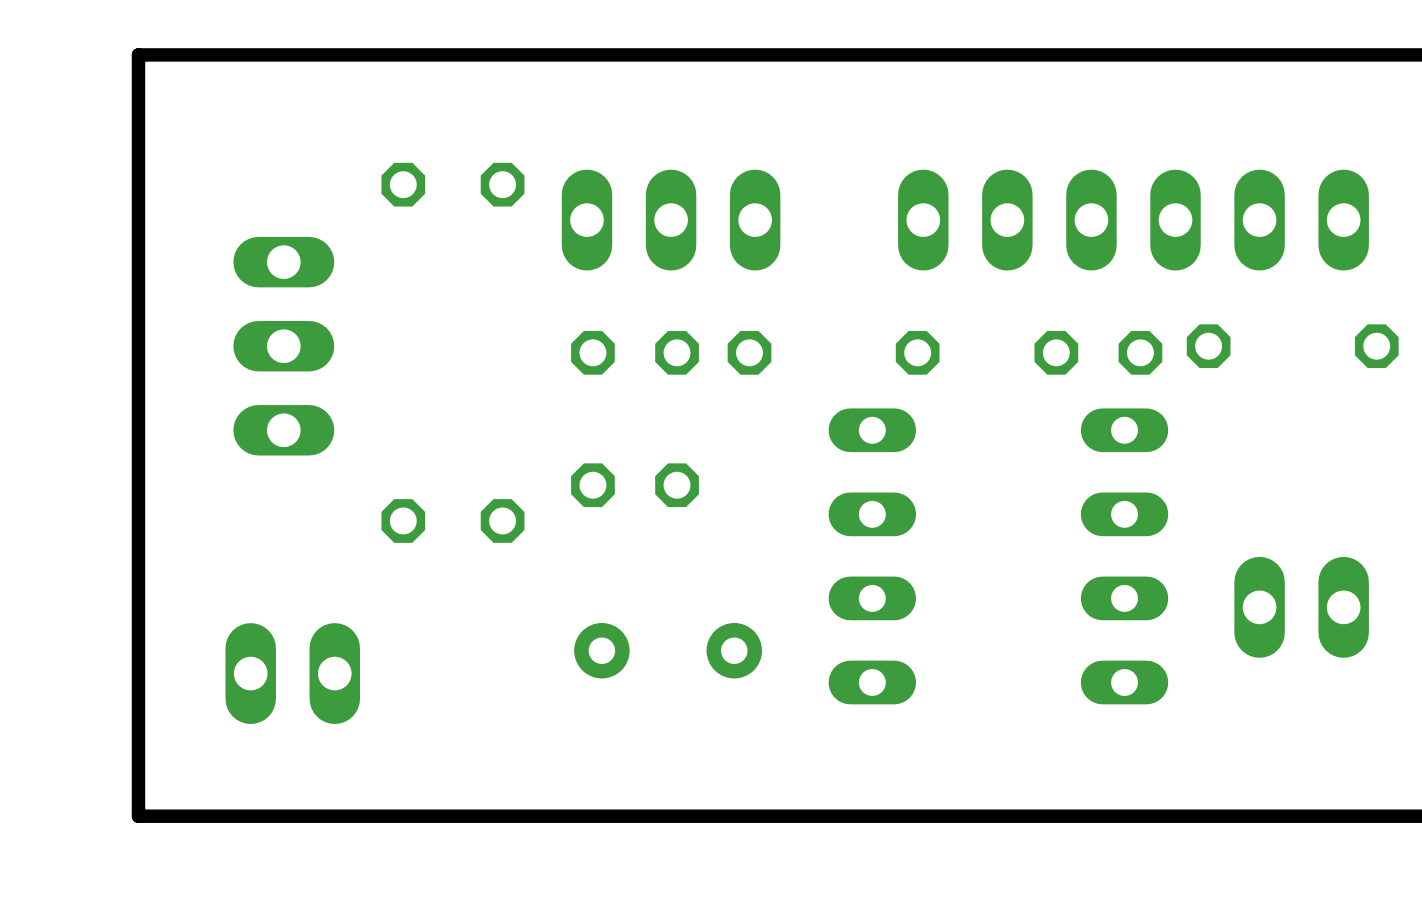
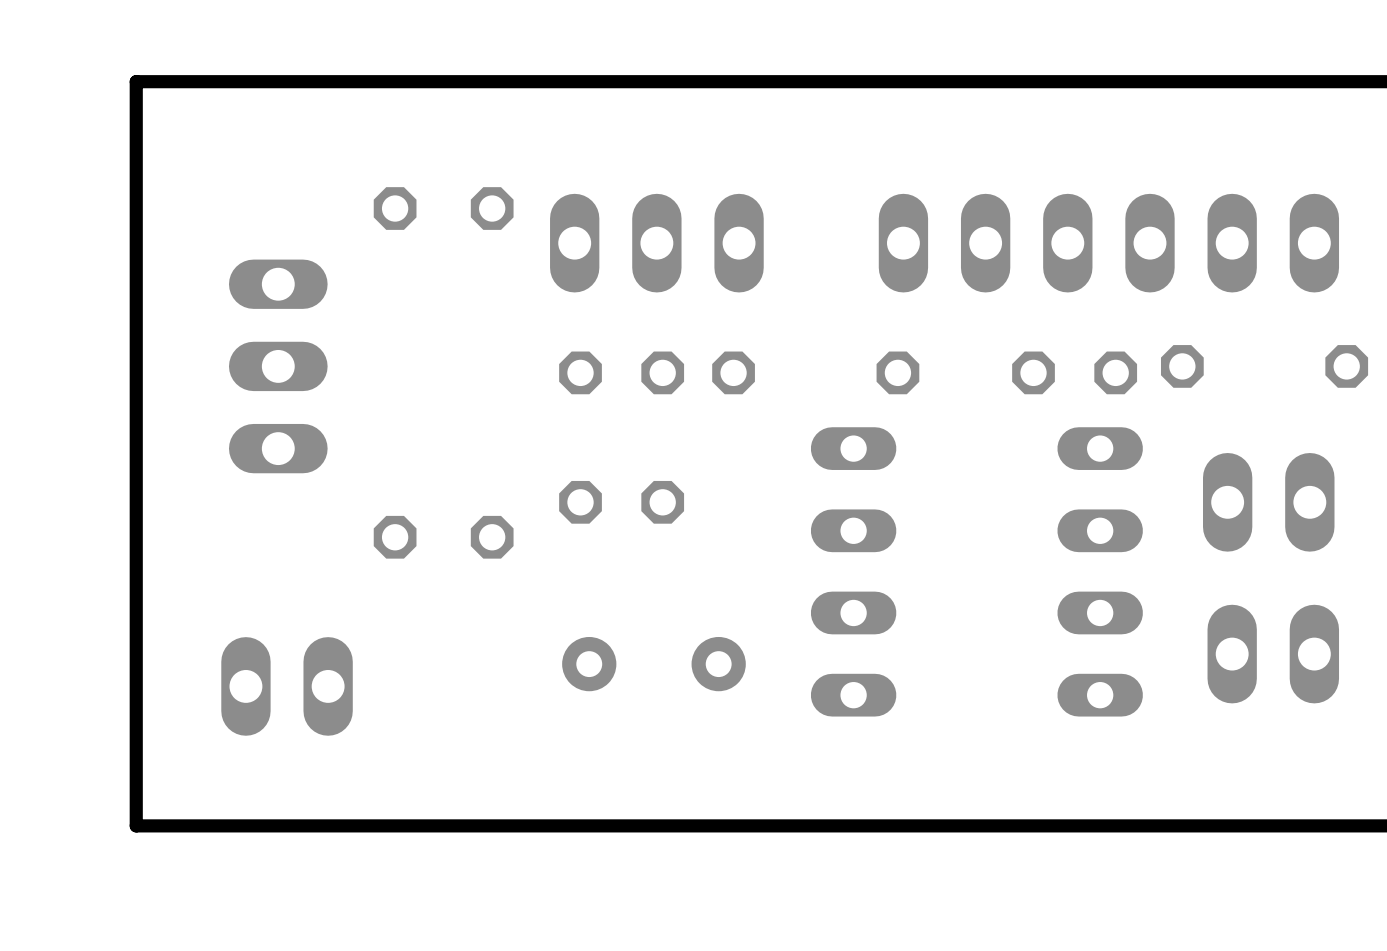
part: none -> (1268, 502)
part position: (1301, 607) -> (1273, 654)

